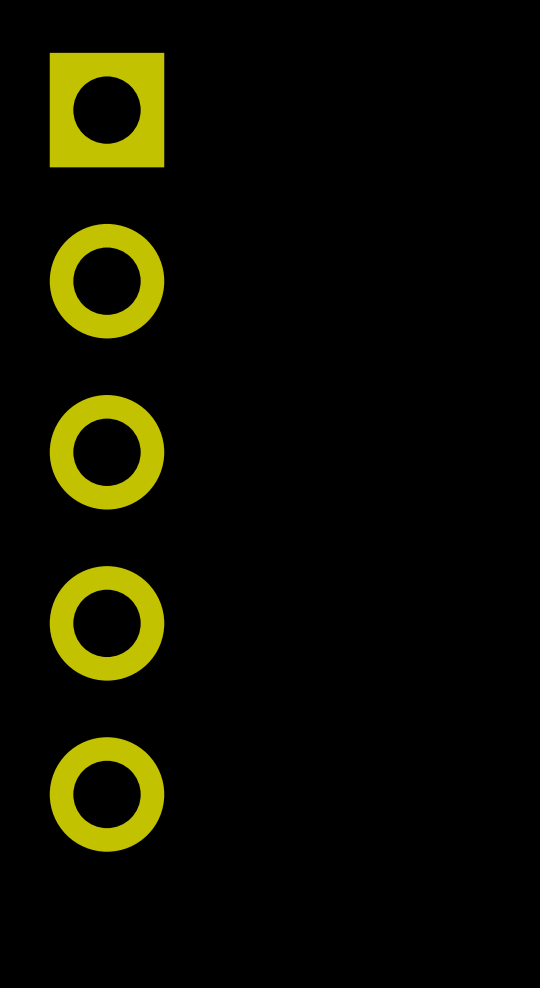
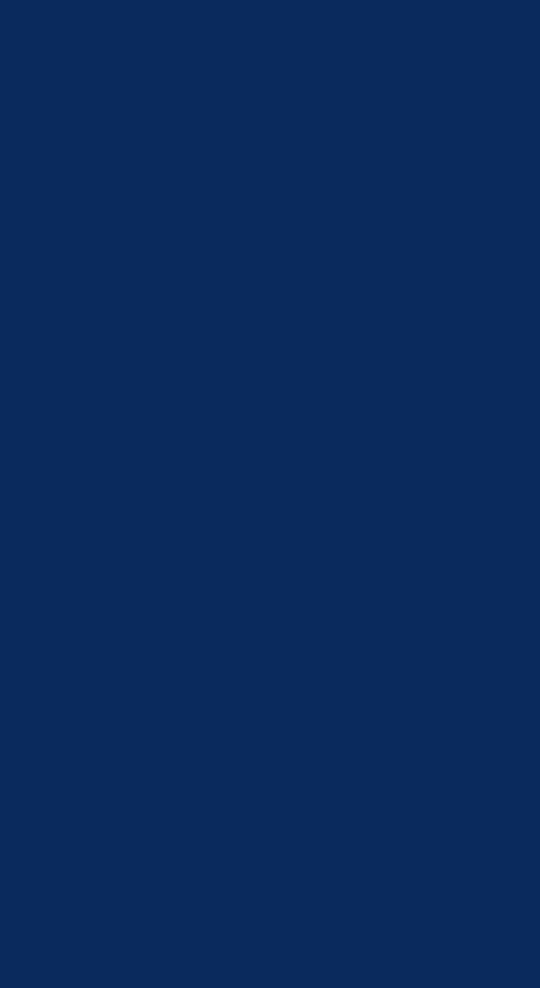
part: (107, 452) -> none

